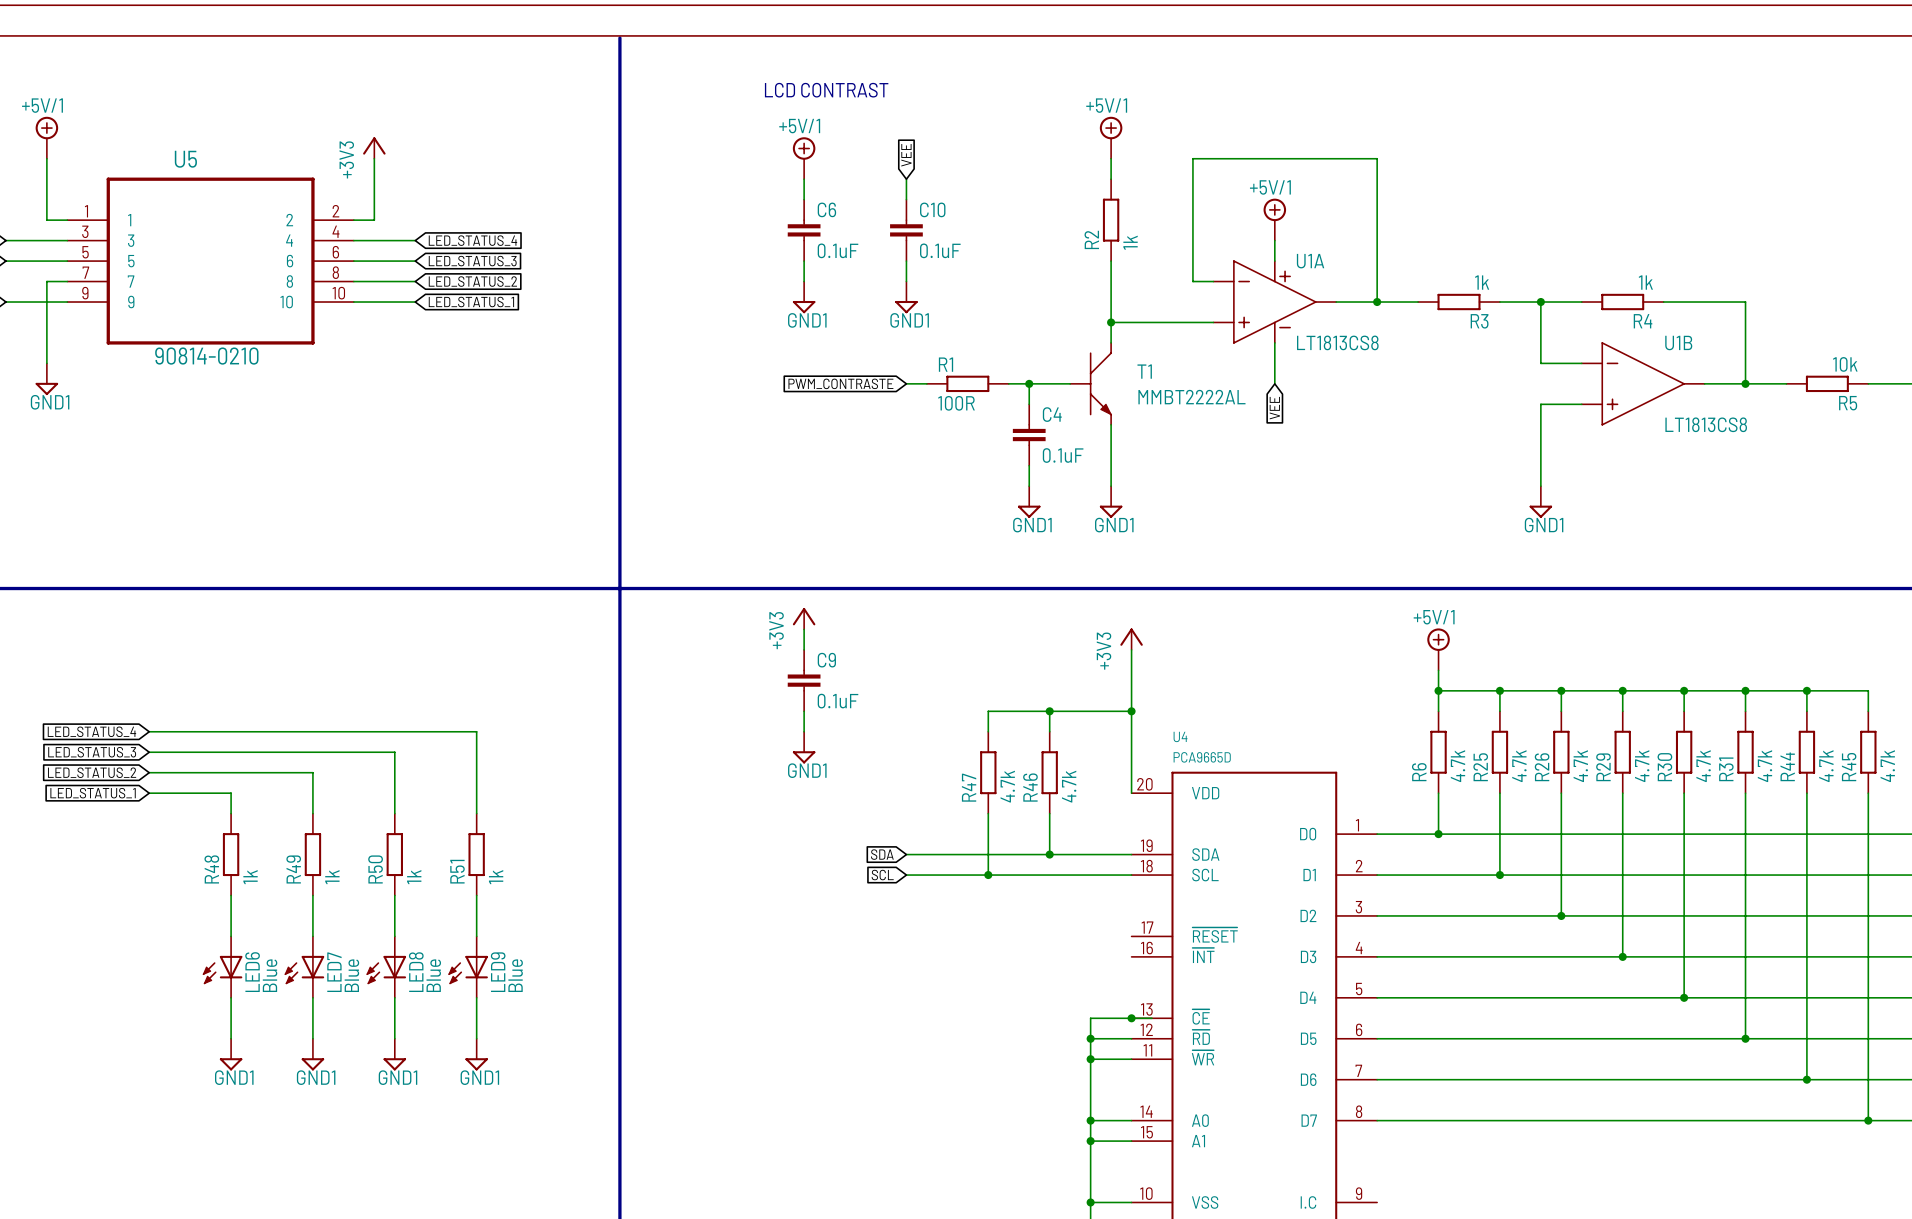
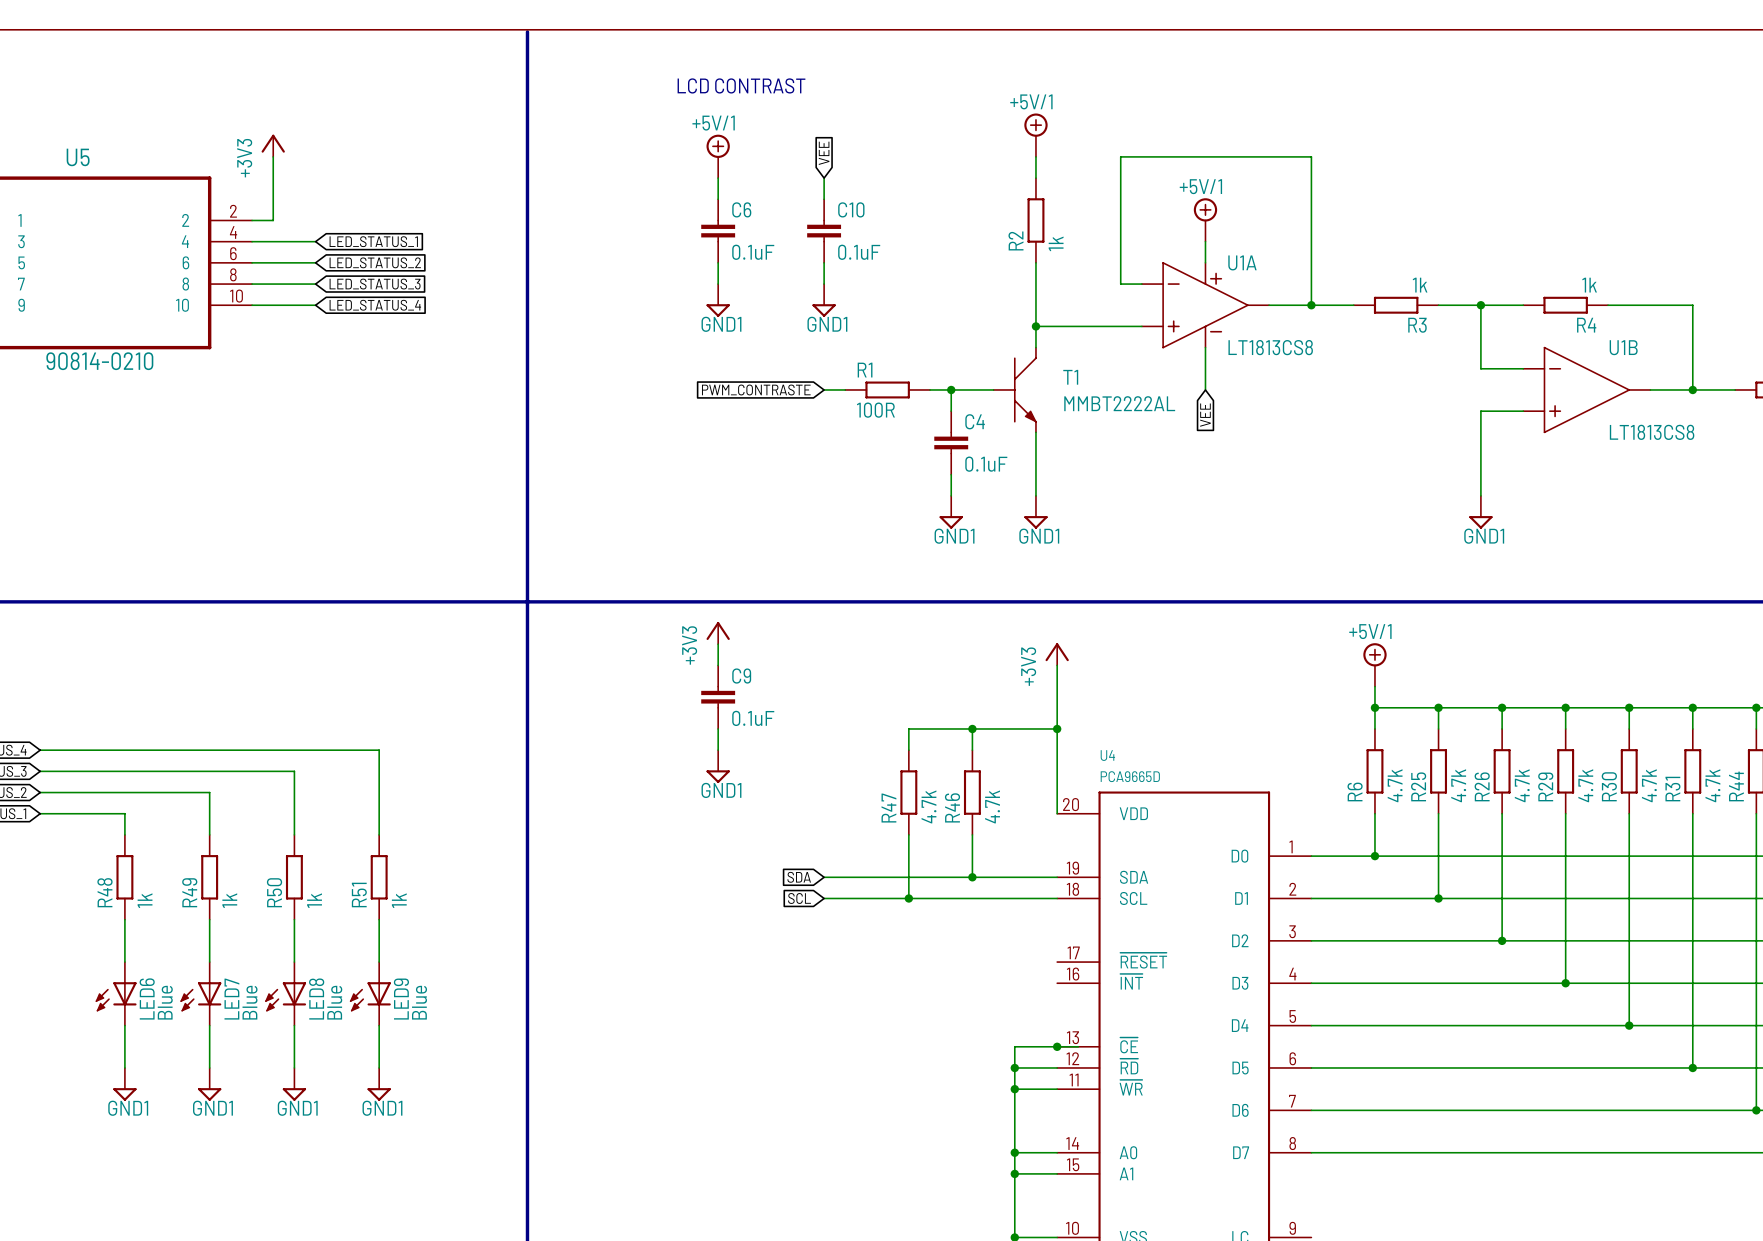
global label: LED_STATUS_4 (472, 240) -> LED_STATUS_1 (373, 241)
global label: LED_STATUS_3 (472, 261) -> LED_STATUS_2 (375, 262)
global label: LED_STATUS_2 (472, 281) -> LED_STATUS_3 (375, 284)
global label: LED_STATUS_1 (471, 302) -> LED_STATUS_4 (375, 305)

